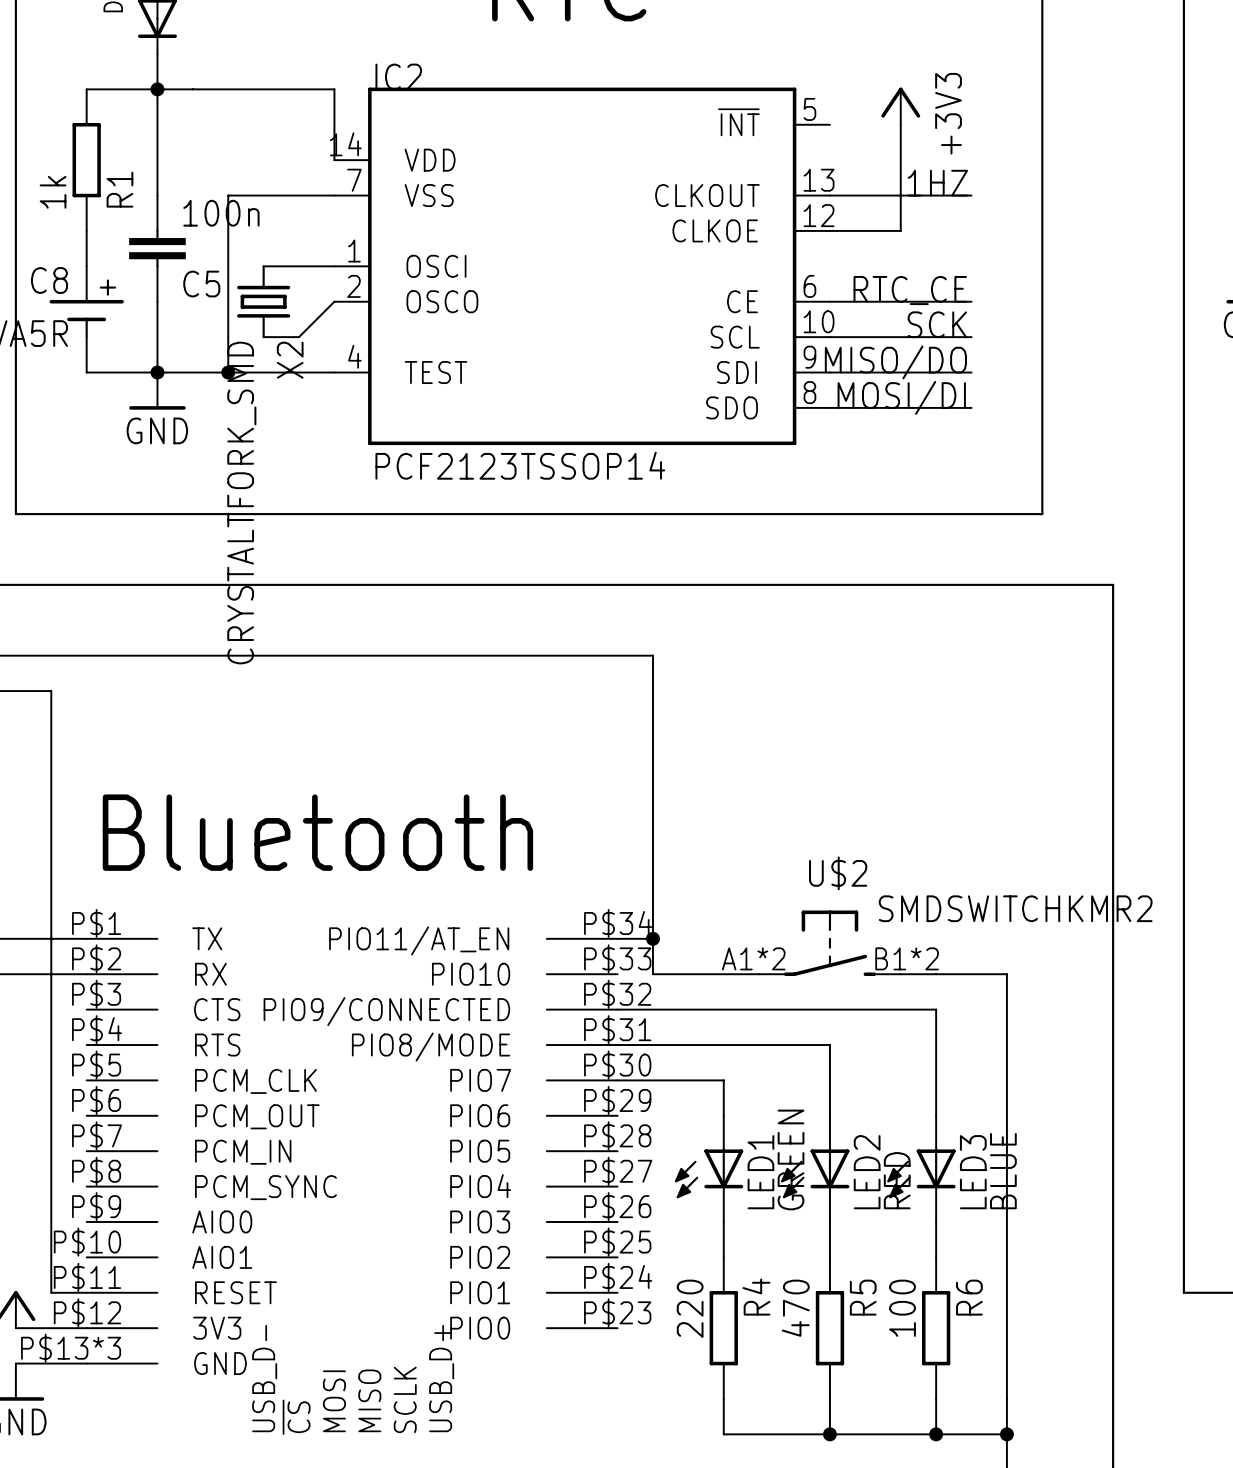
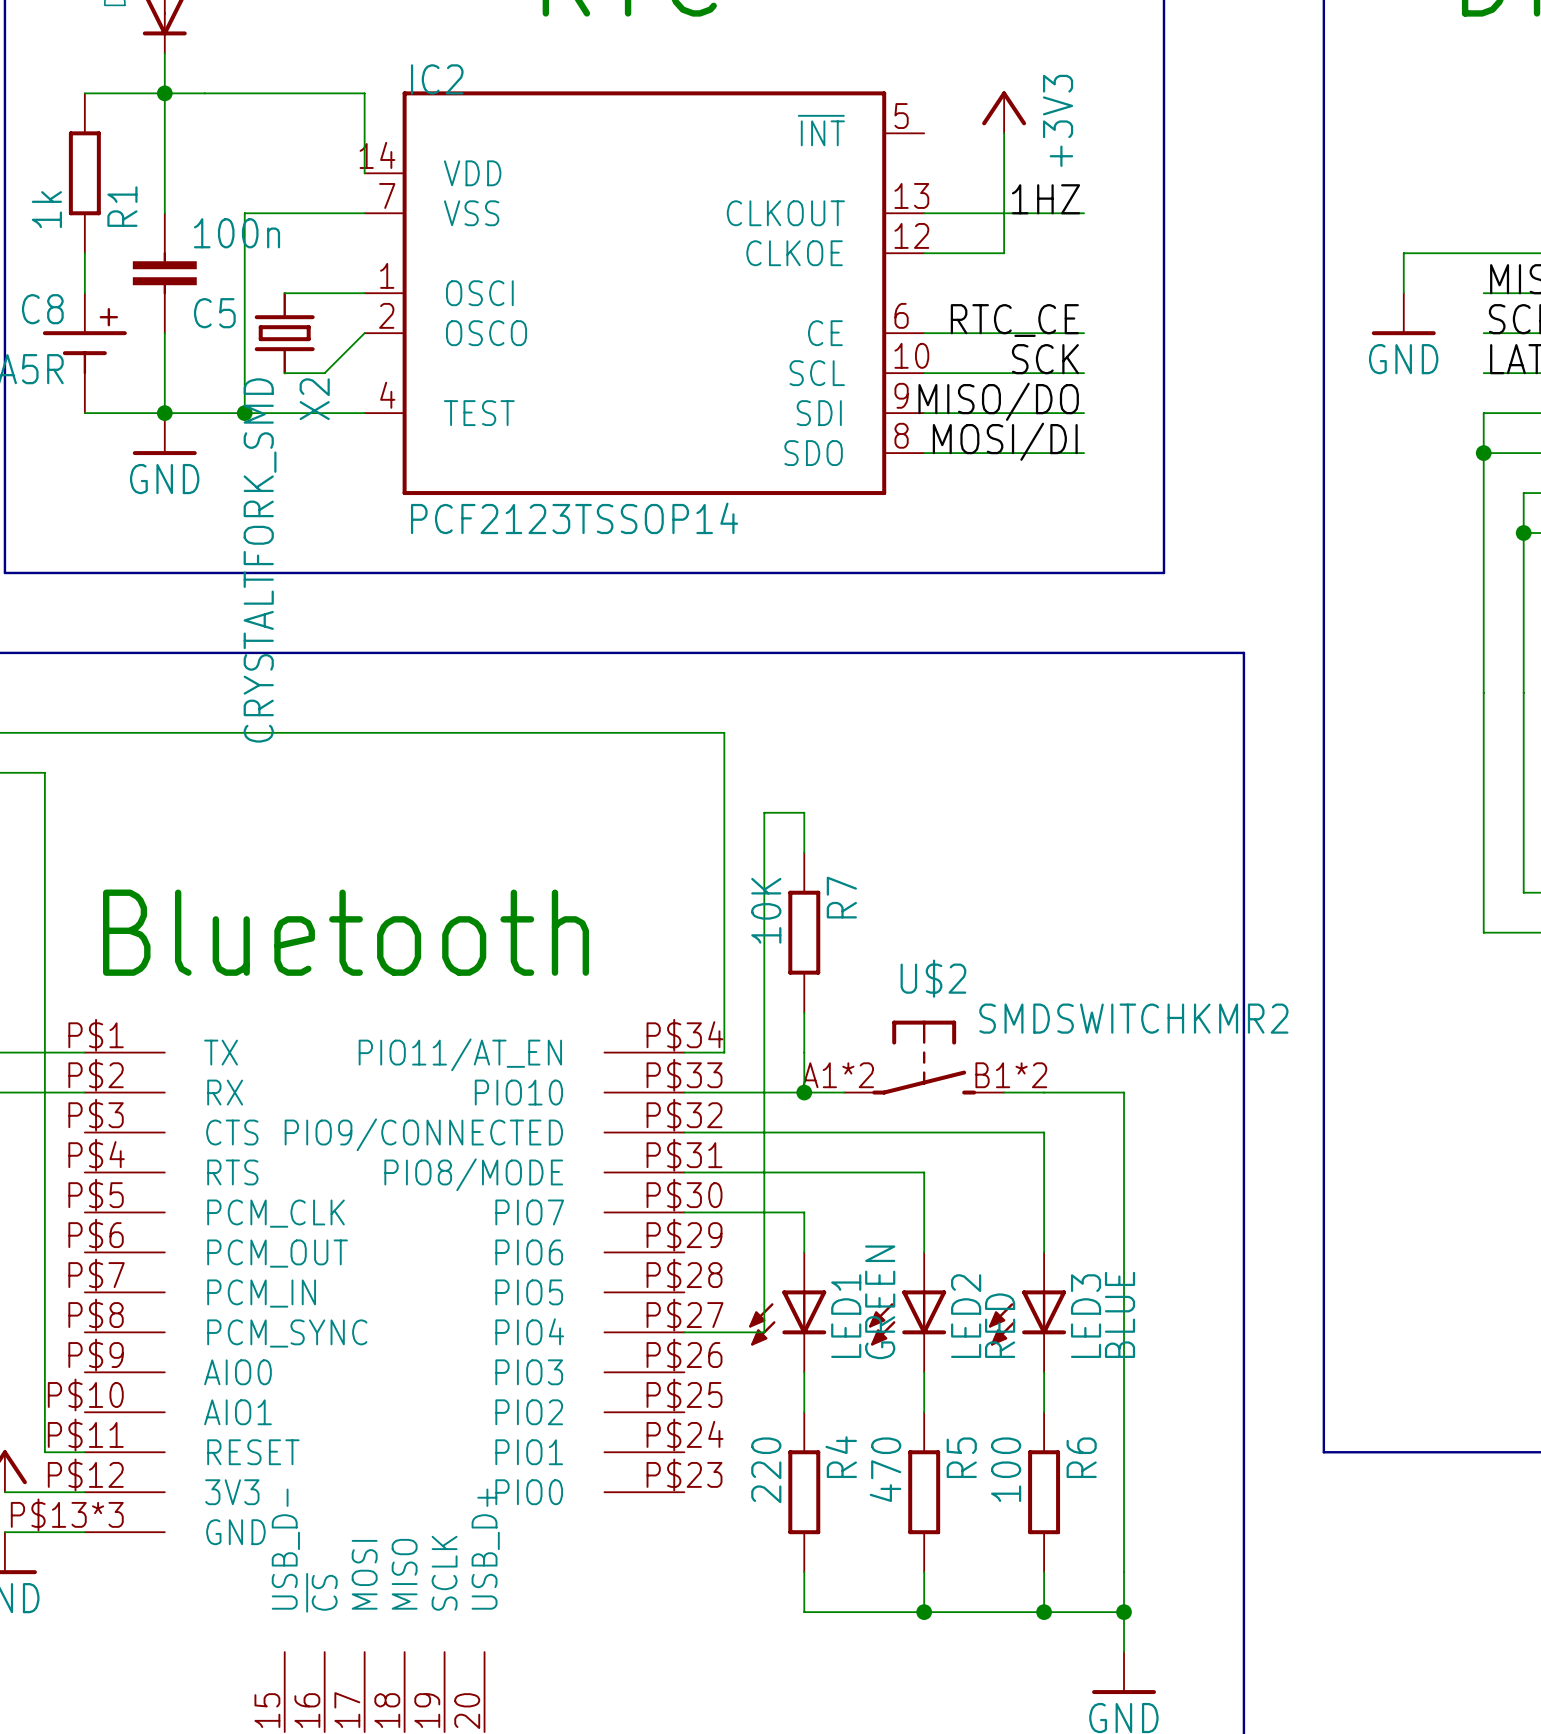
wire: none -> (804, 852) (804, 812) (764, 812) (764, 1332) (684, 1332)
R7: none -> 10K (804, 932)
wire: none -> (804, 1012) (804, 1092)
wire: (652, 938) (652, 974) -> (684, 1092) (724, 1092)
junction position: (652, 938) -> (804, 1092)

